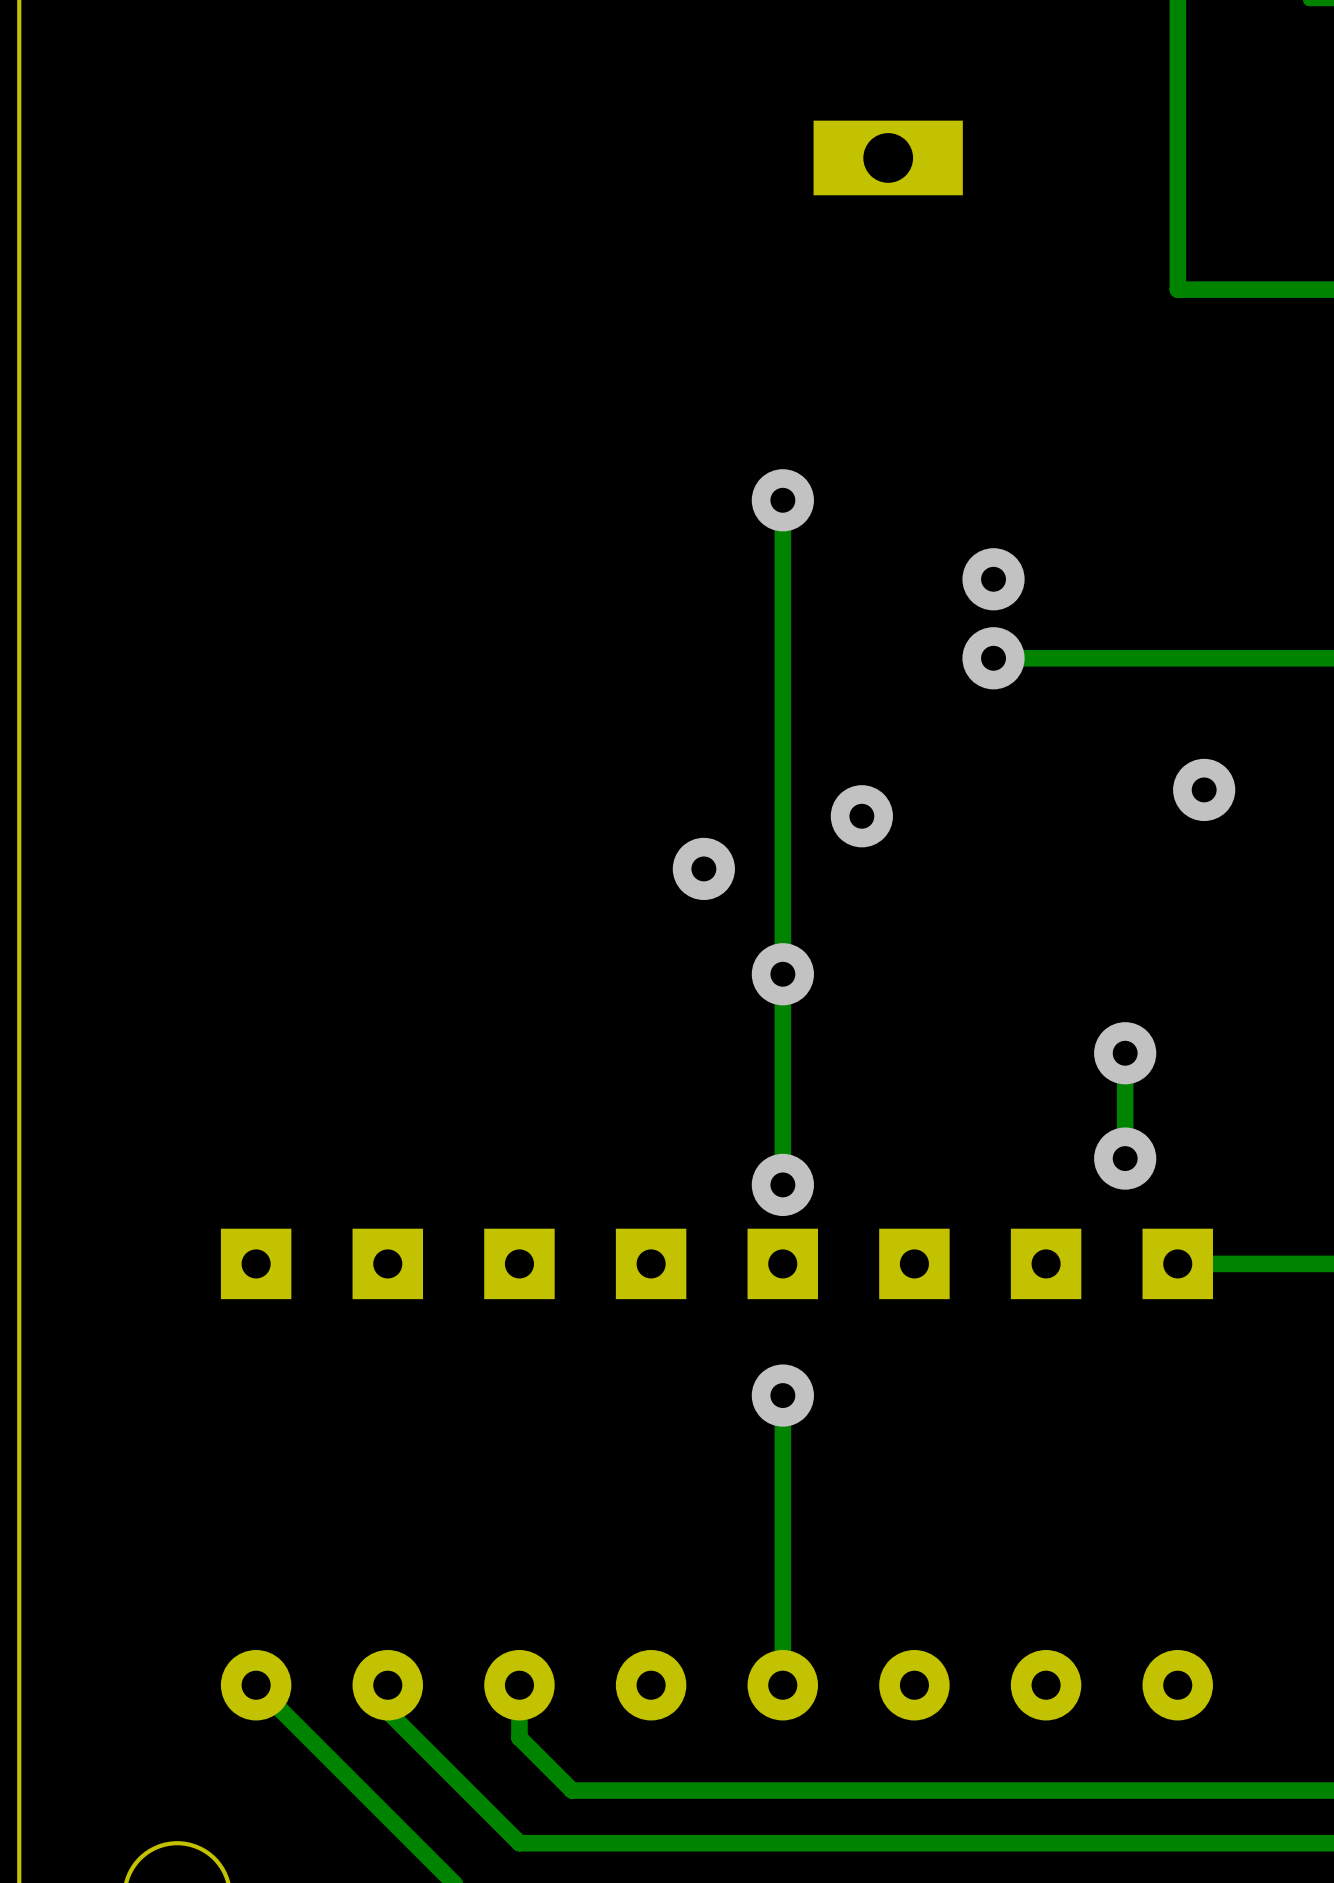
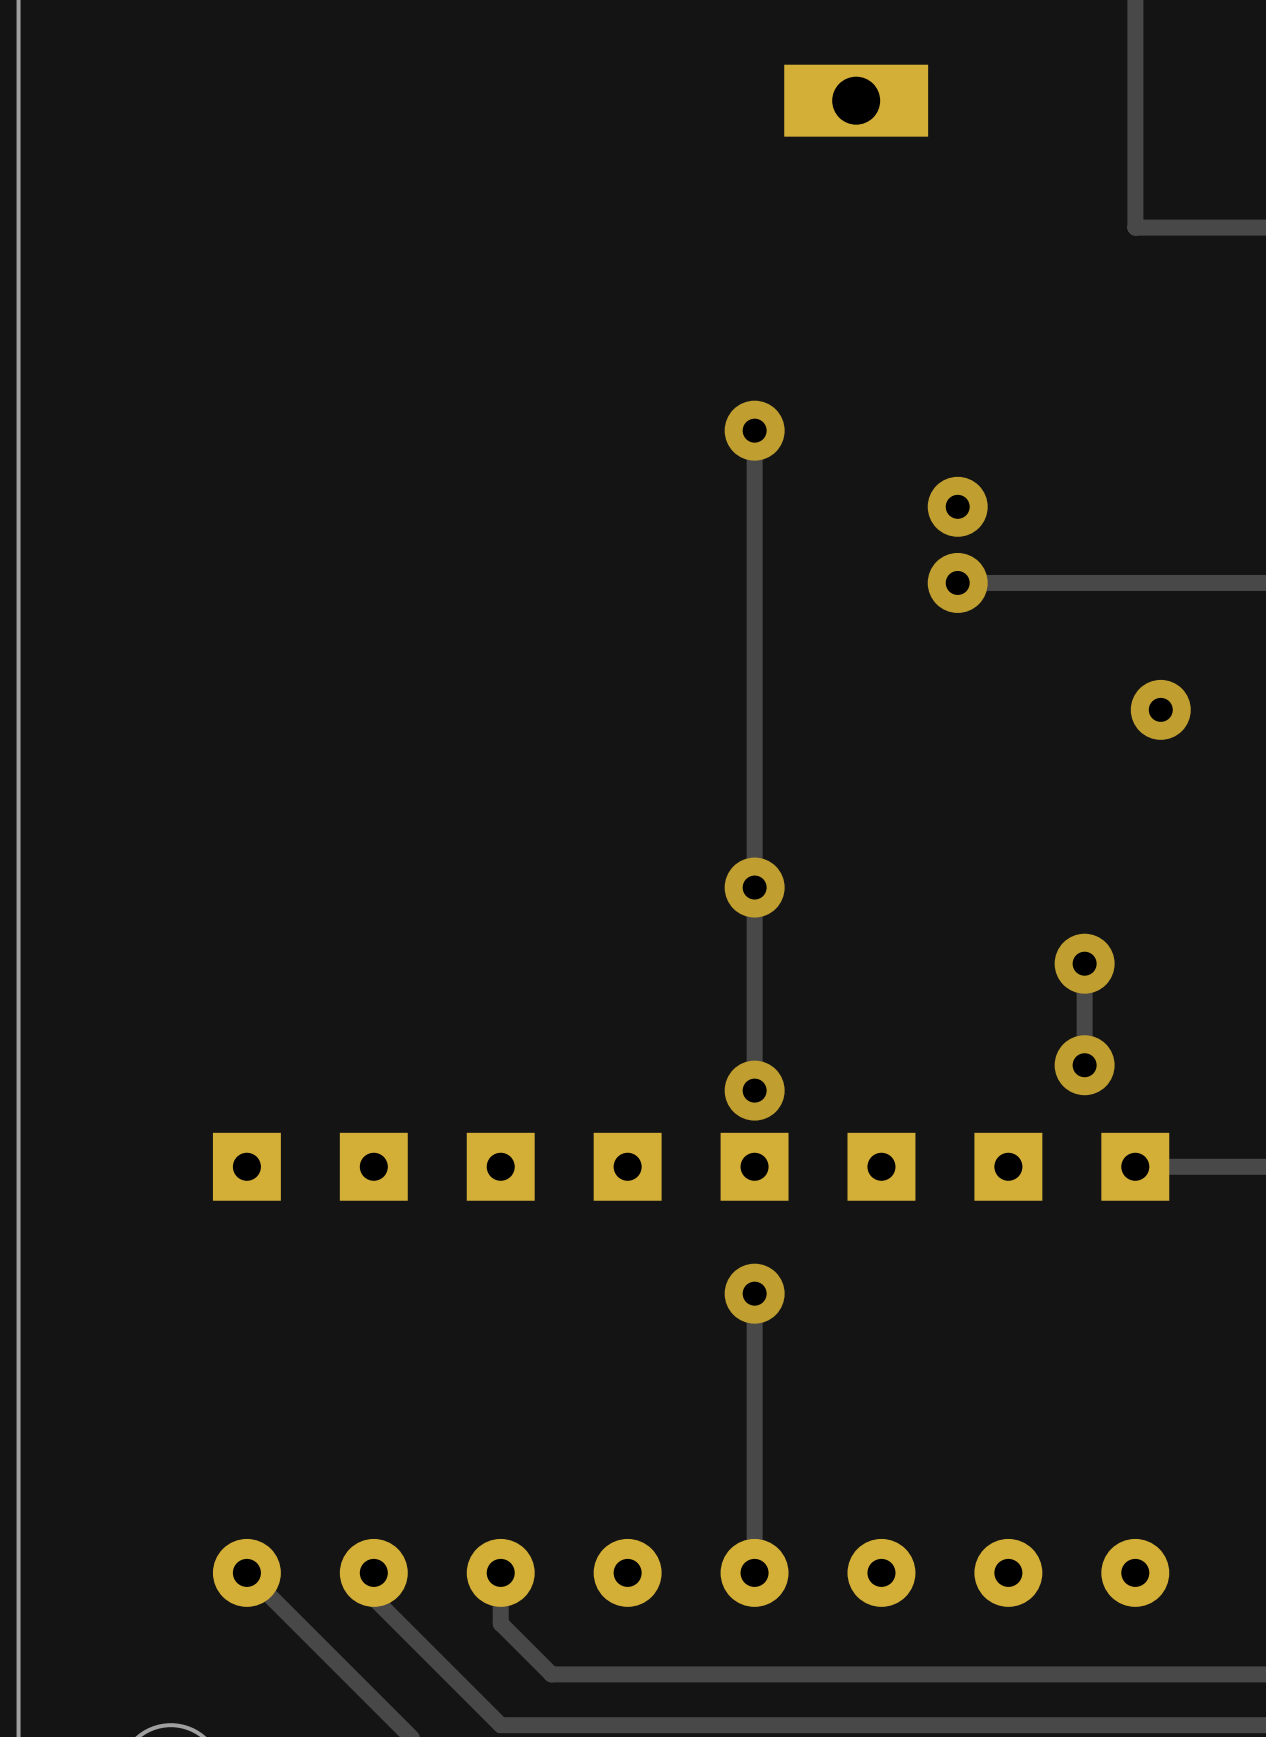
via: (861, 816) -> none
via: (703, 868) -> none

